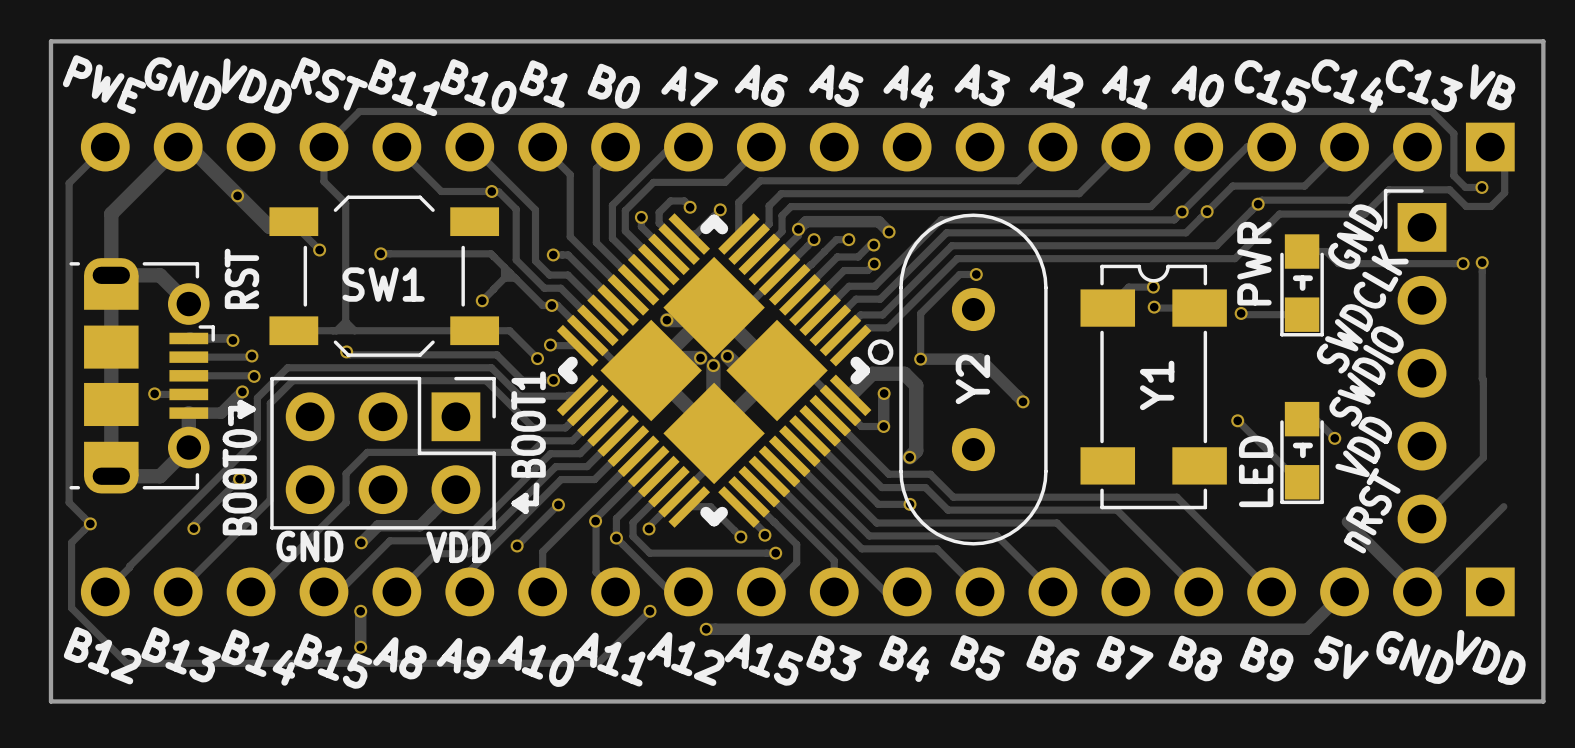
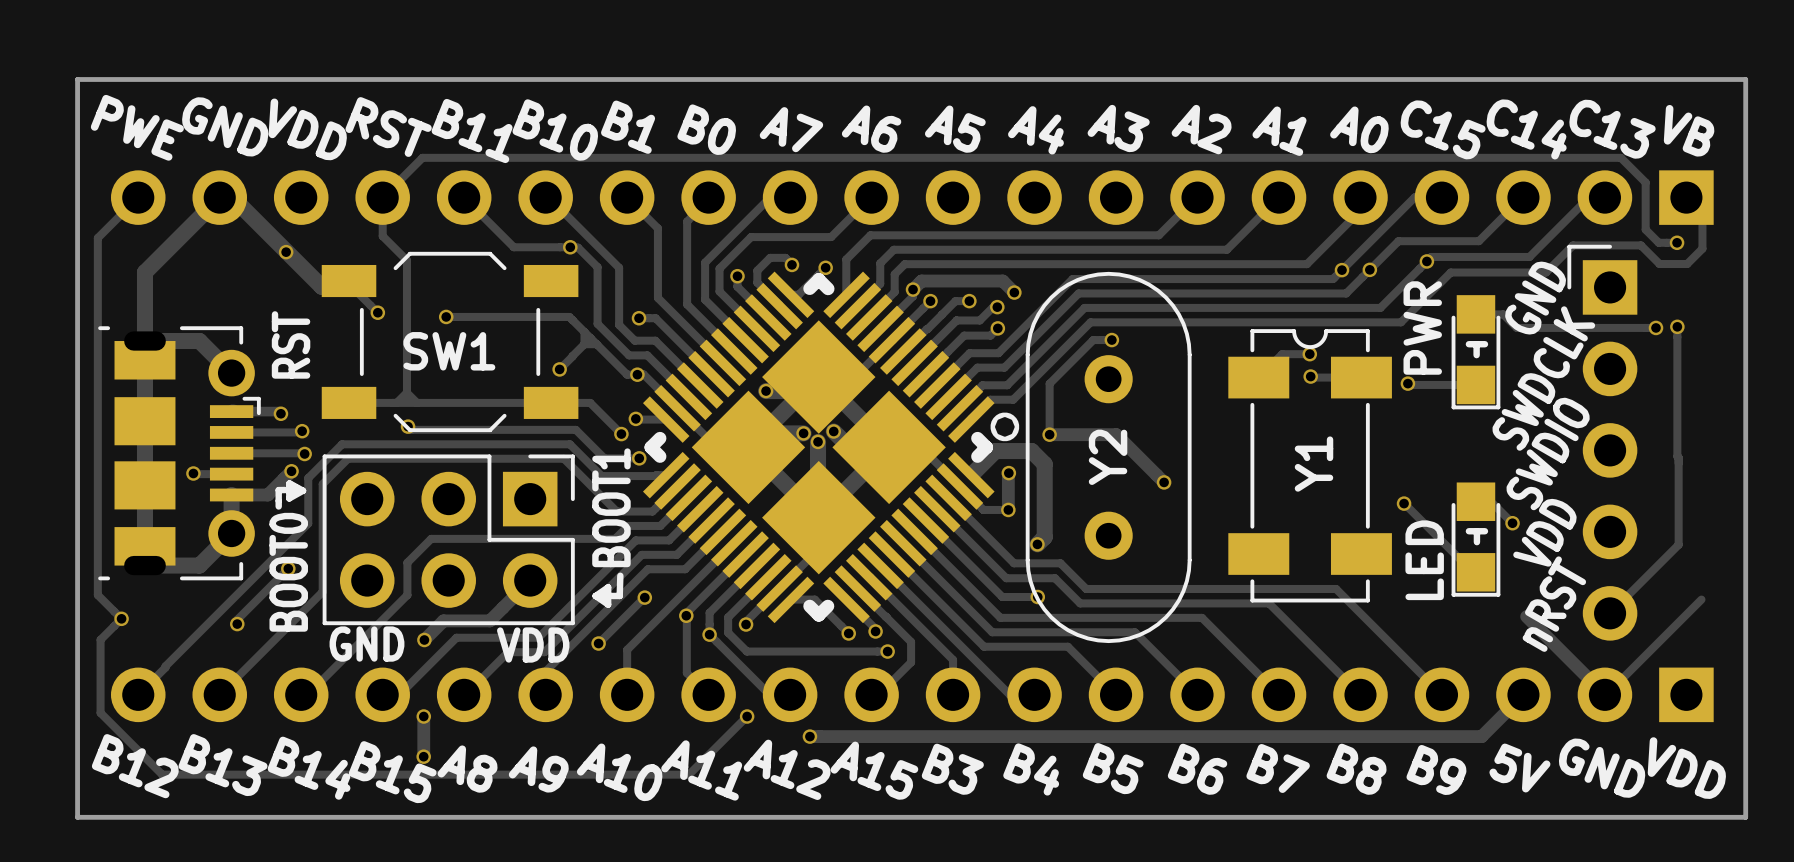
part footprint: [69, 258, 215, 494] -> [98, 326, 261, 581]

